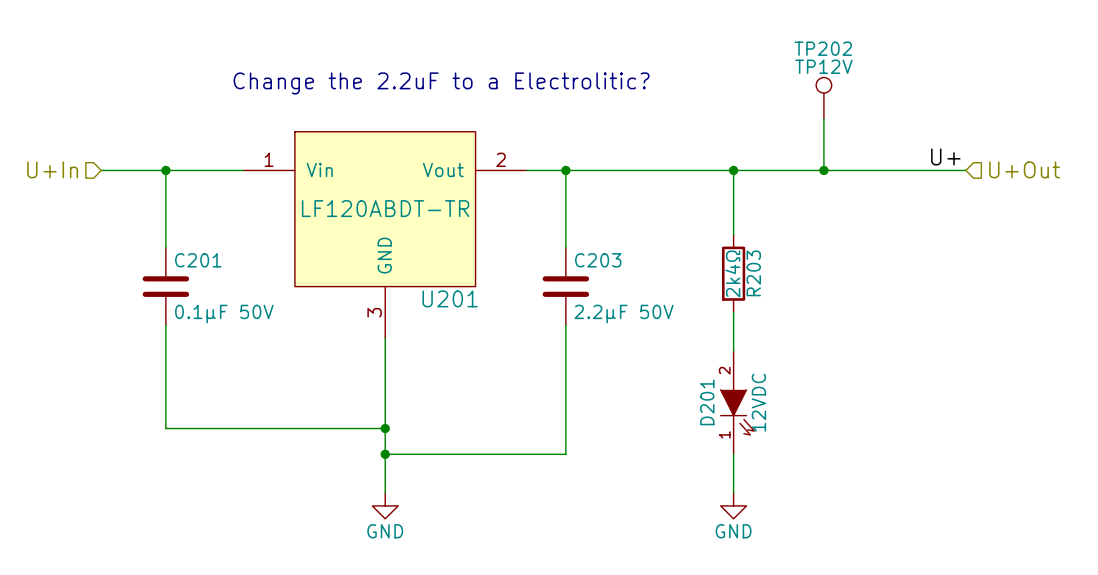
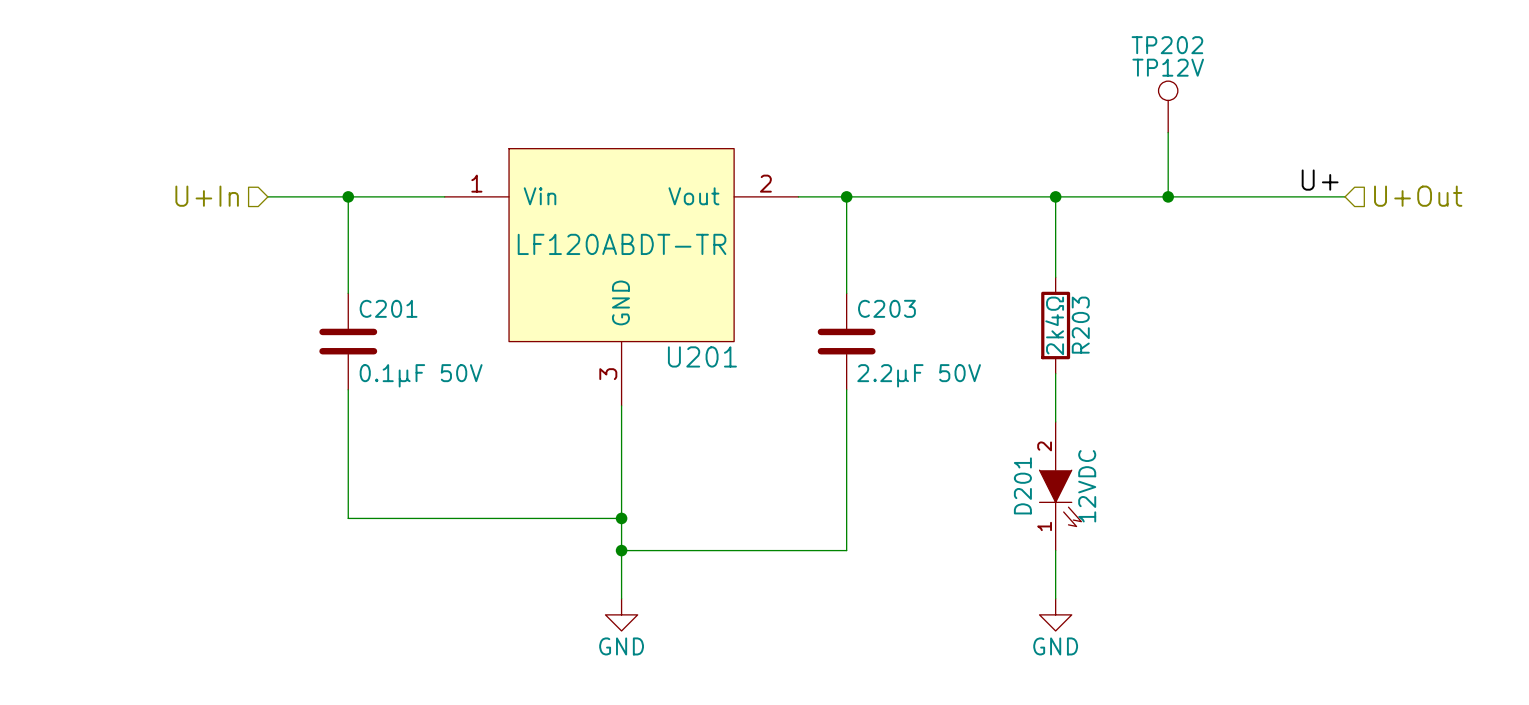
text: Change the 2.2uF to a Electrolitic? (441, 83) -> none

